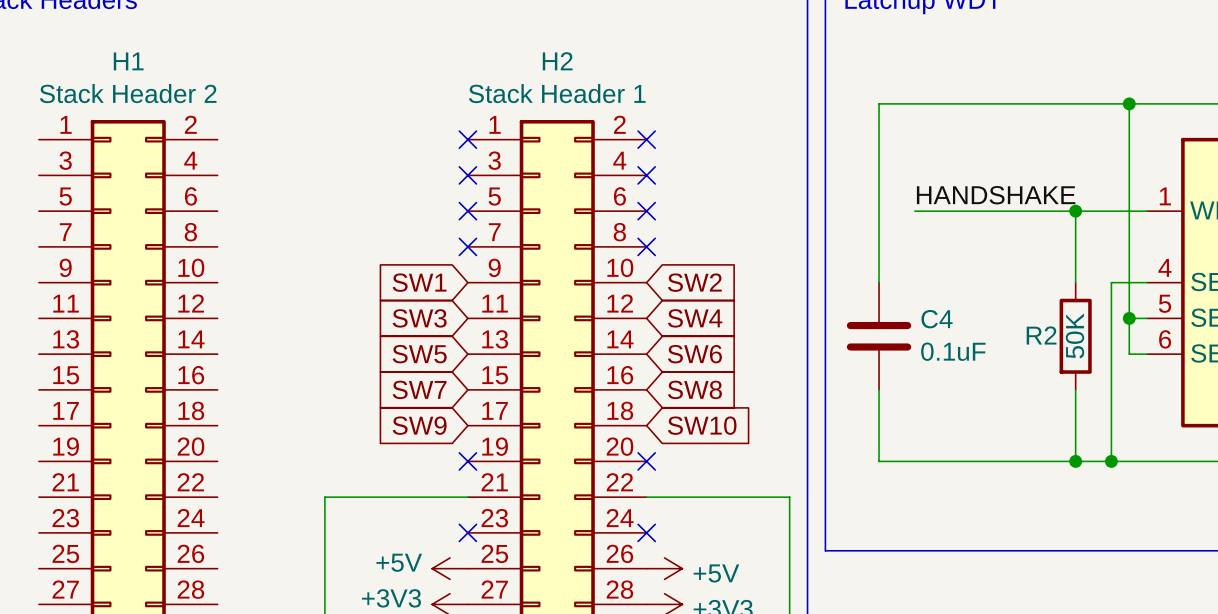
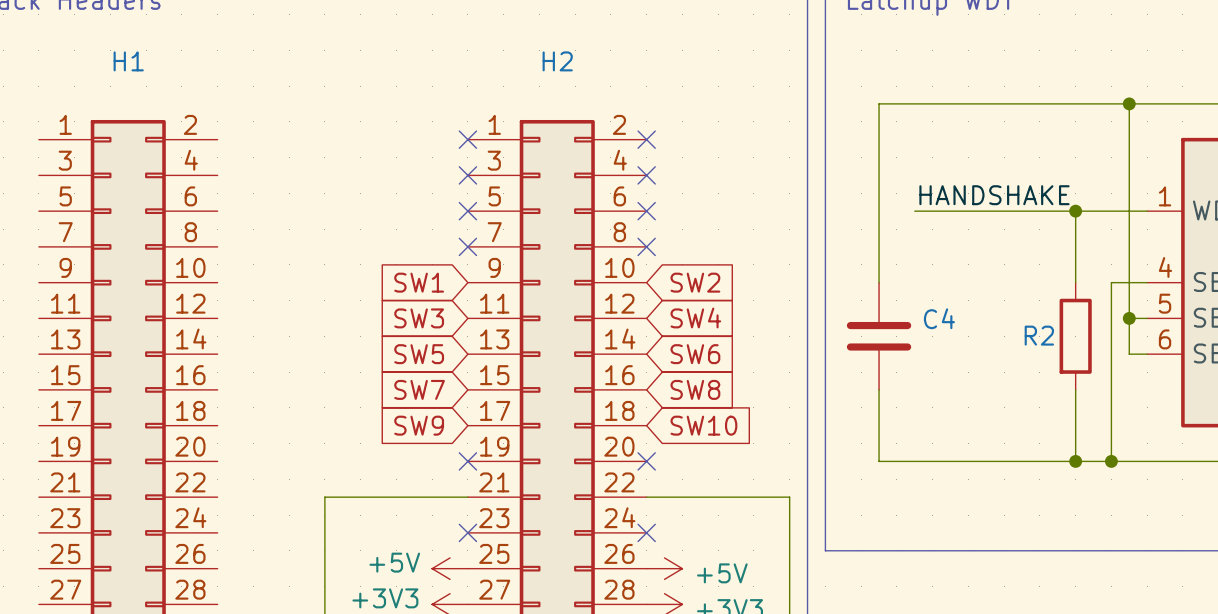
H1 value: Stack Header 2 (128, 93) -> none
H2 value: Stack Header 1 (557, 93) -> none
R2 value: 50K (1074, 335) -> none
C4 value: 0.1uF (953, 351) -> none

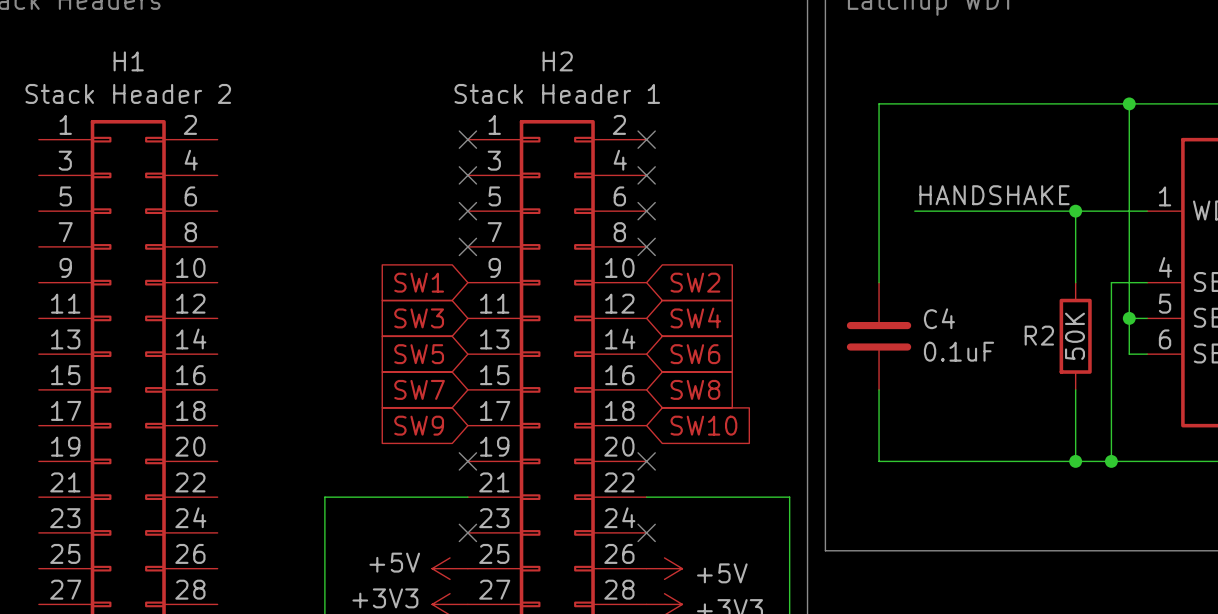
H1 value: none -> Stack Header 2 (128, 93)
H2 value: none -> Stack Header 1 (557, 93)
R2 value: none -> 50K (1074, 336)
C4 value: none -> 0.1uF (959, 351)

